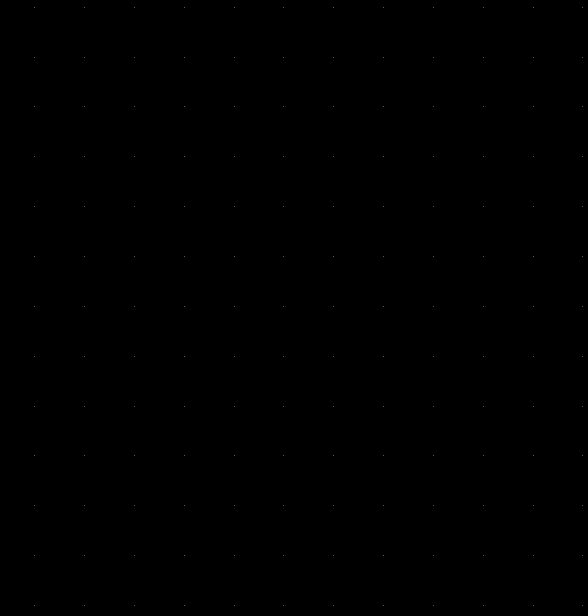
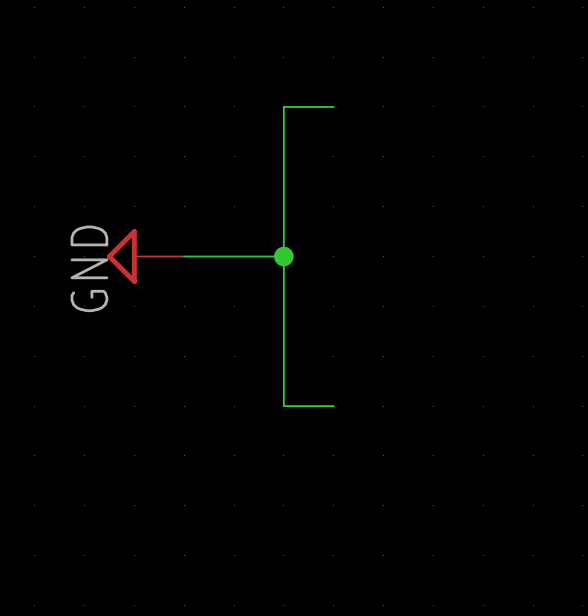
wire: none -> (333, 106) (283, 106) (283, 406) (333, 406)
power symbol: none -> GND (145, 256)
wire: none -> (184, 256) (283, 256)
junction: none -> (283, 256)

